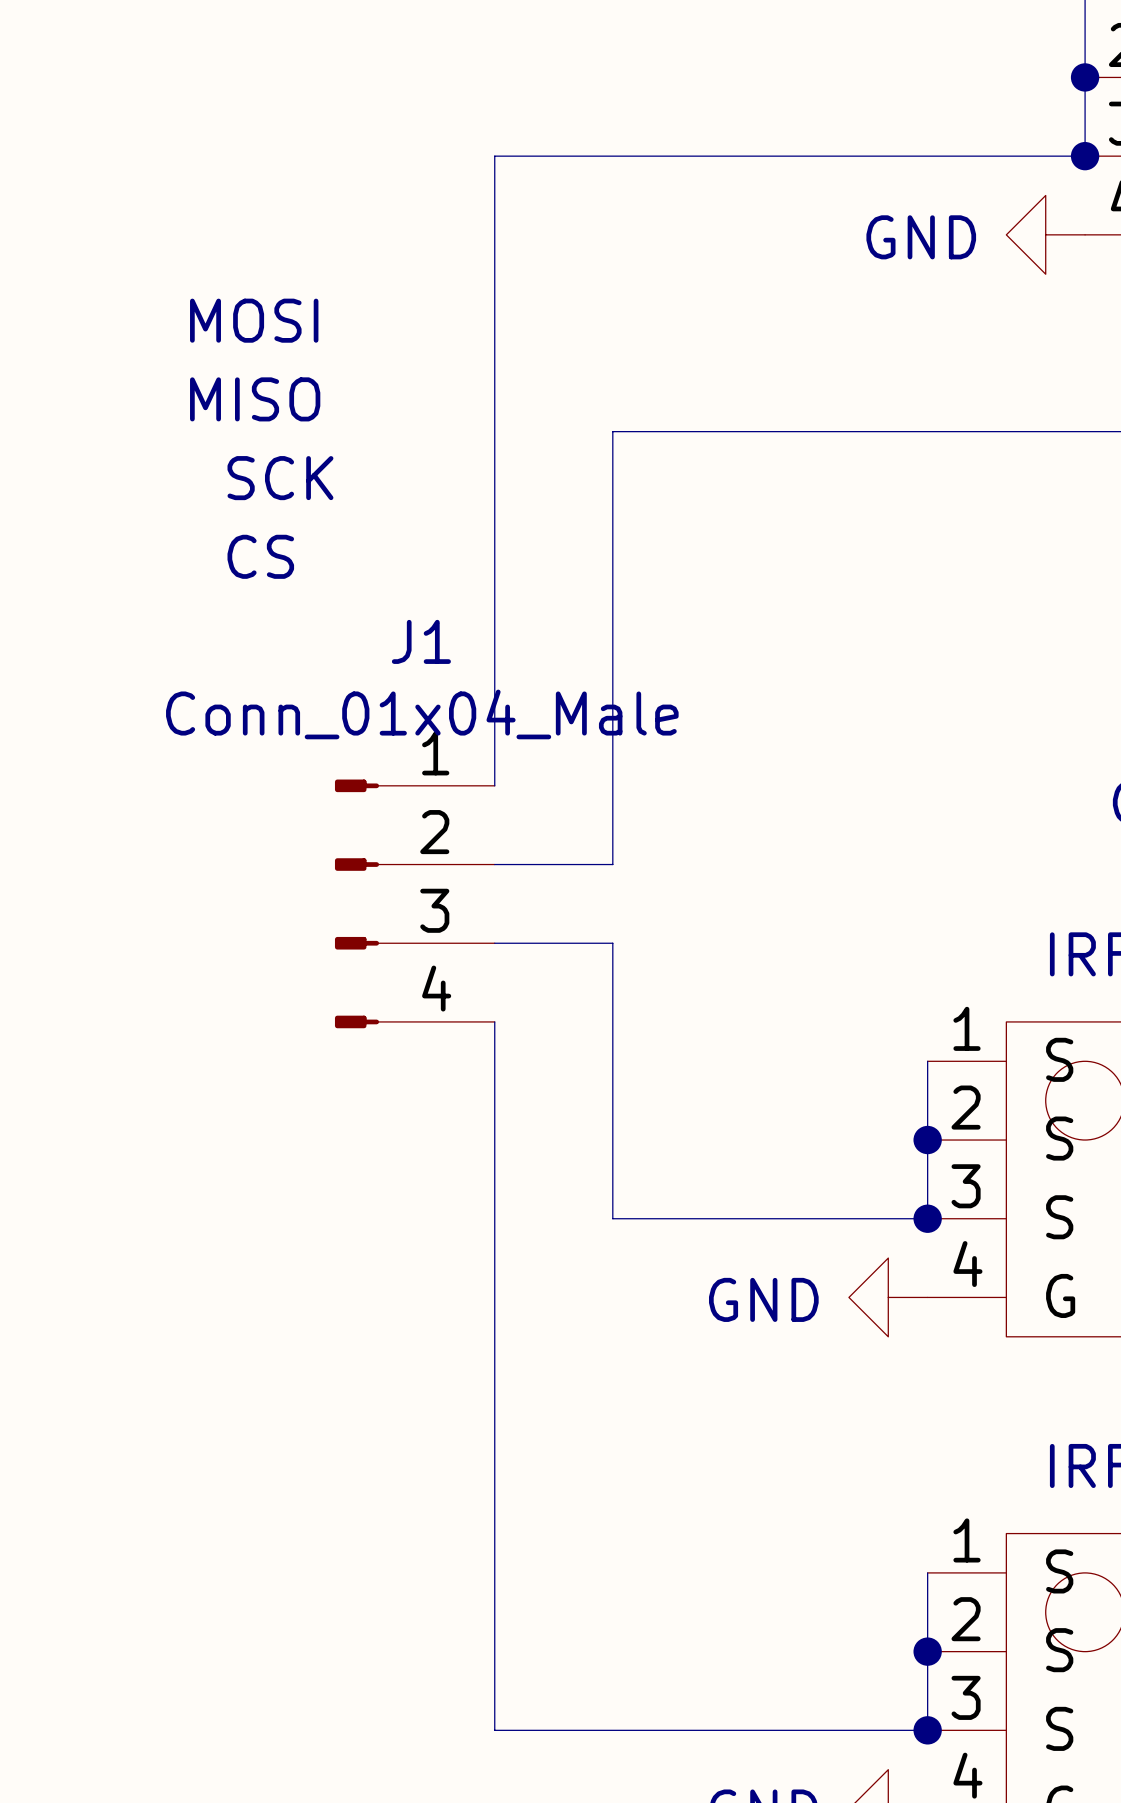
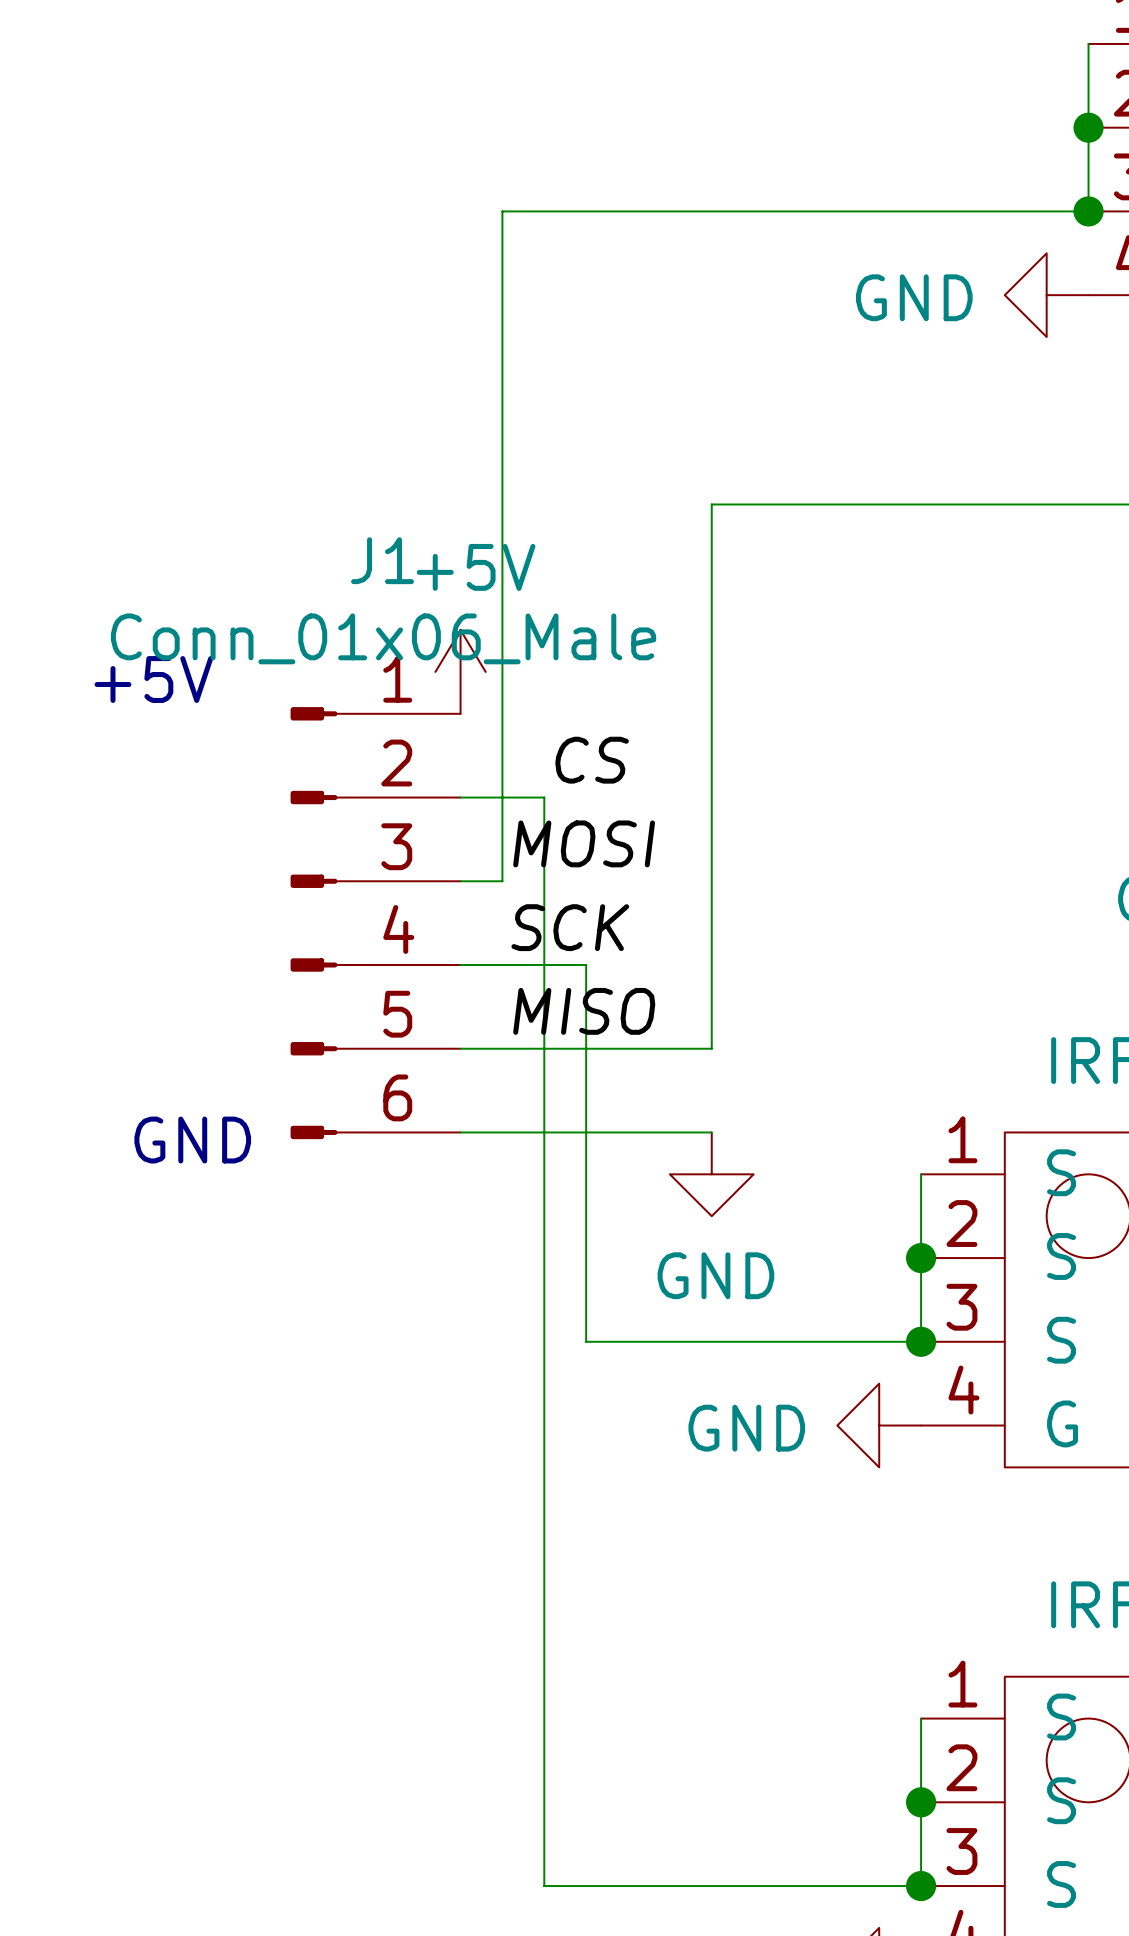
wire: (534, 156) (494, 156) (494, 785) -> (502, 211) (502, 881) (460, 881)
text: MOSI (254, 320) -> none
text: MISO (255, 399) -> none
wire: (730, 431) (612, 431) (612, 864) -> (711, 504) (711, 1048) (586, 1048) (586, 965)
text: SCK (280, 478) -> none
text: CS (260, 556) -> none
power symbol: none -> +5V (460, 671)
text: none -> +5V (153, 679)
J1 name position: J1 (421, 641) -> J1 (382, 560)
label: none -> CS (592, 760)
J1 value: Conn_01x04_Male (422, 714) -> Conn_01x06_Male (383, 638)
label: none -> MOSI (584, 843)
J1 symbol: [334, 779, 495, 1029] -> [290, 707, 461, 1140]
label: none -> SCK (570, 927)
label: none -> MISO (584, 1011)
wire: (494, 1021) (494, 1730) (573, 1730) -> (460, 797) (544, 797) (544, 1886)
wire: none -> (460, 1132) (711, 1132)
text: none -> GND (192, 1140)
power symbol: none -> GND (711, 1174)

